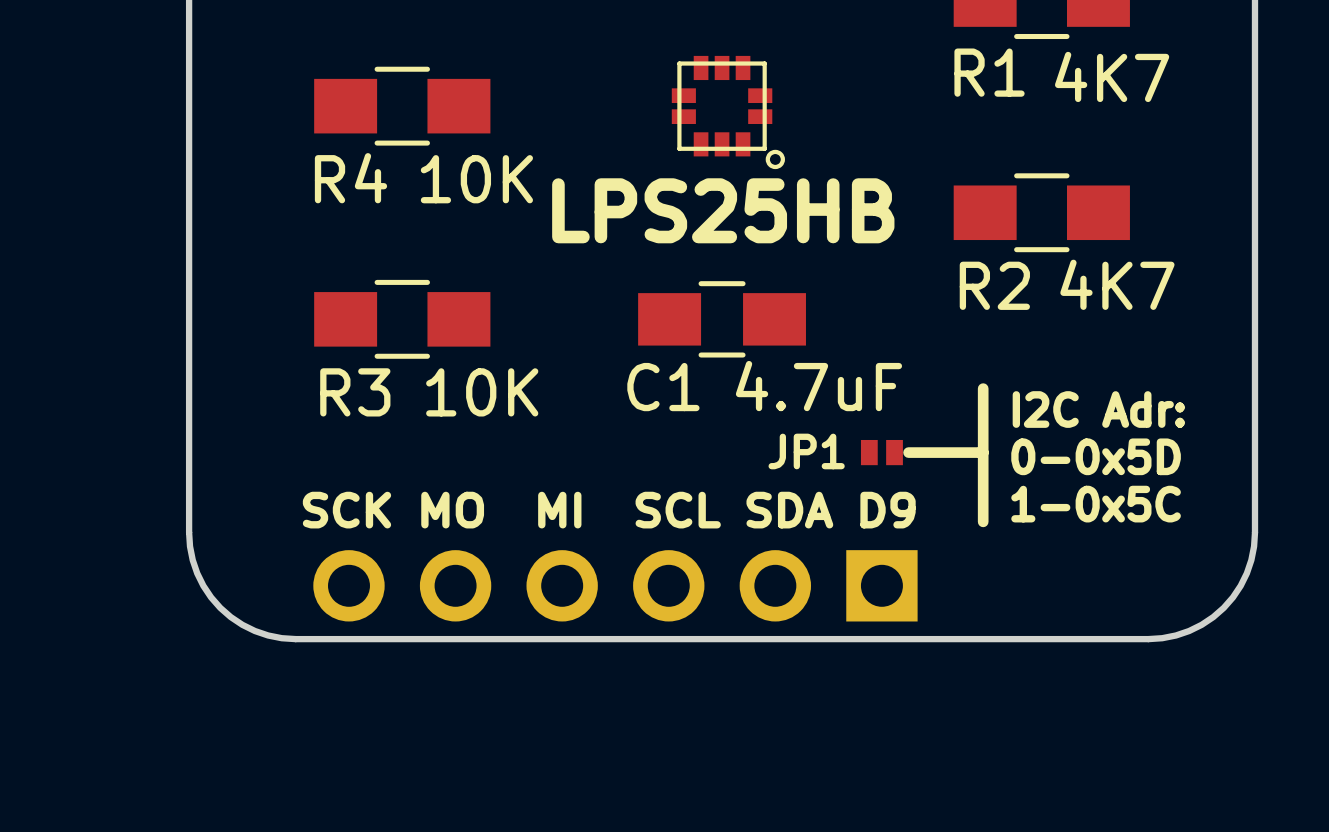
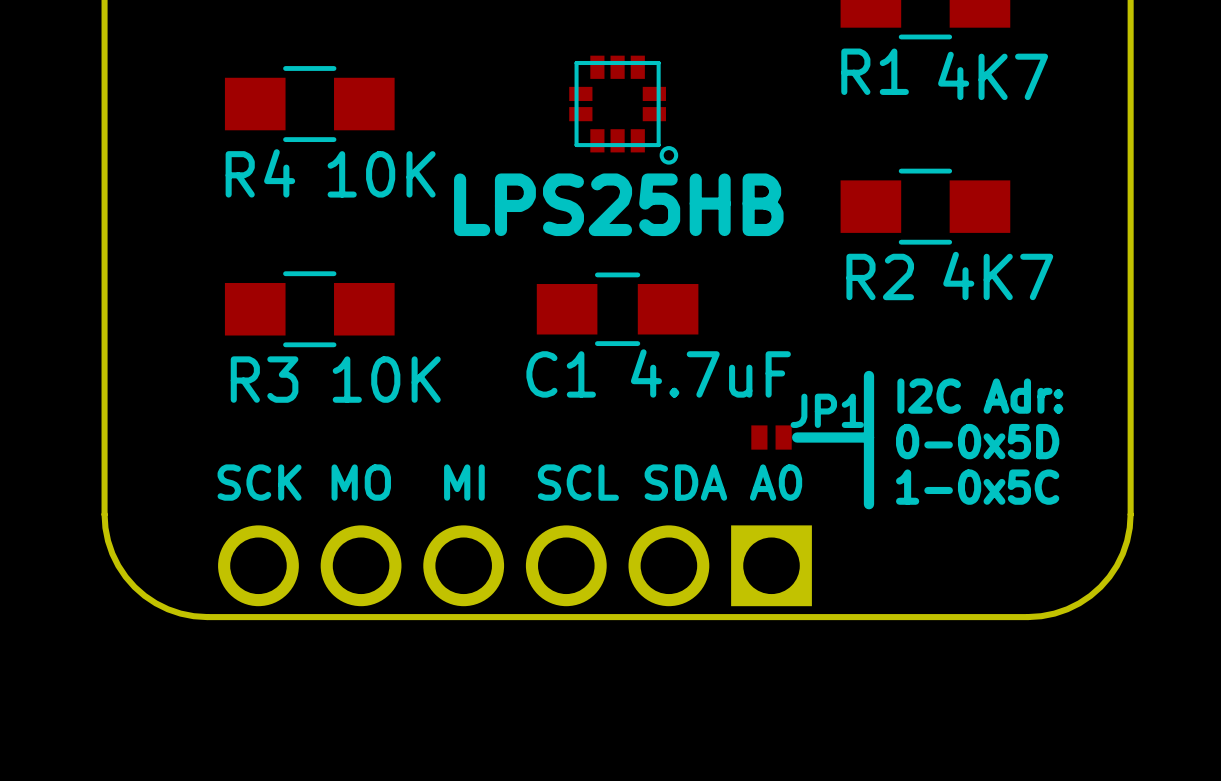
JP1 name position: JP1 (806, 451) -> JP1 (827, 410)
text: SCK MO MI SCL SDA D9 (609, 510) -> none
part footprint: [313, 550, 918, 622] -> [218, 525, 812, 607]

